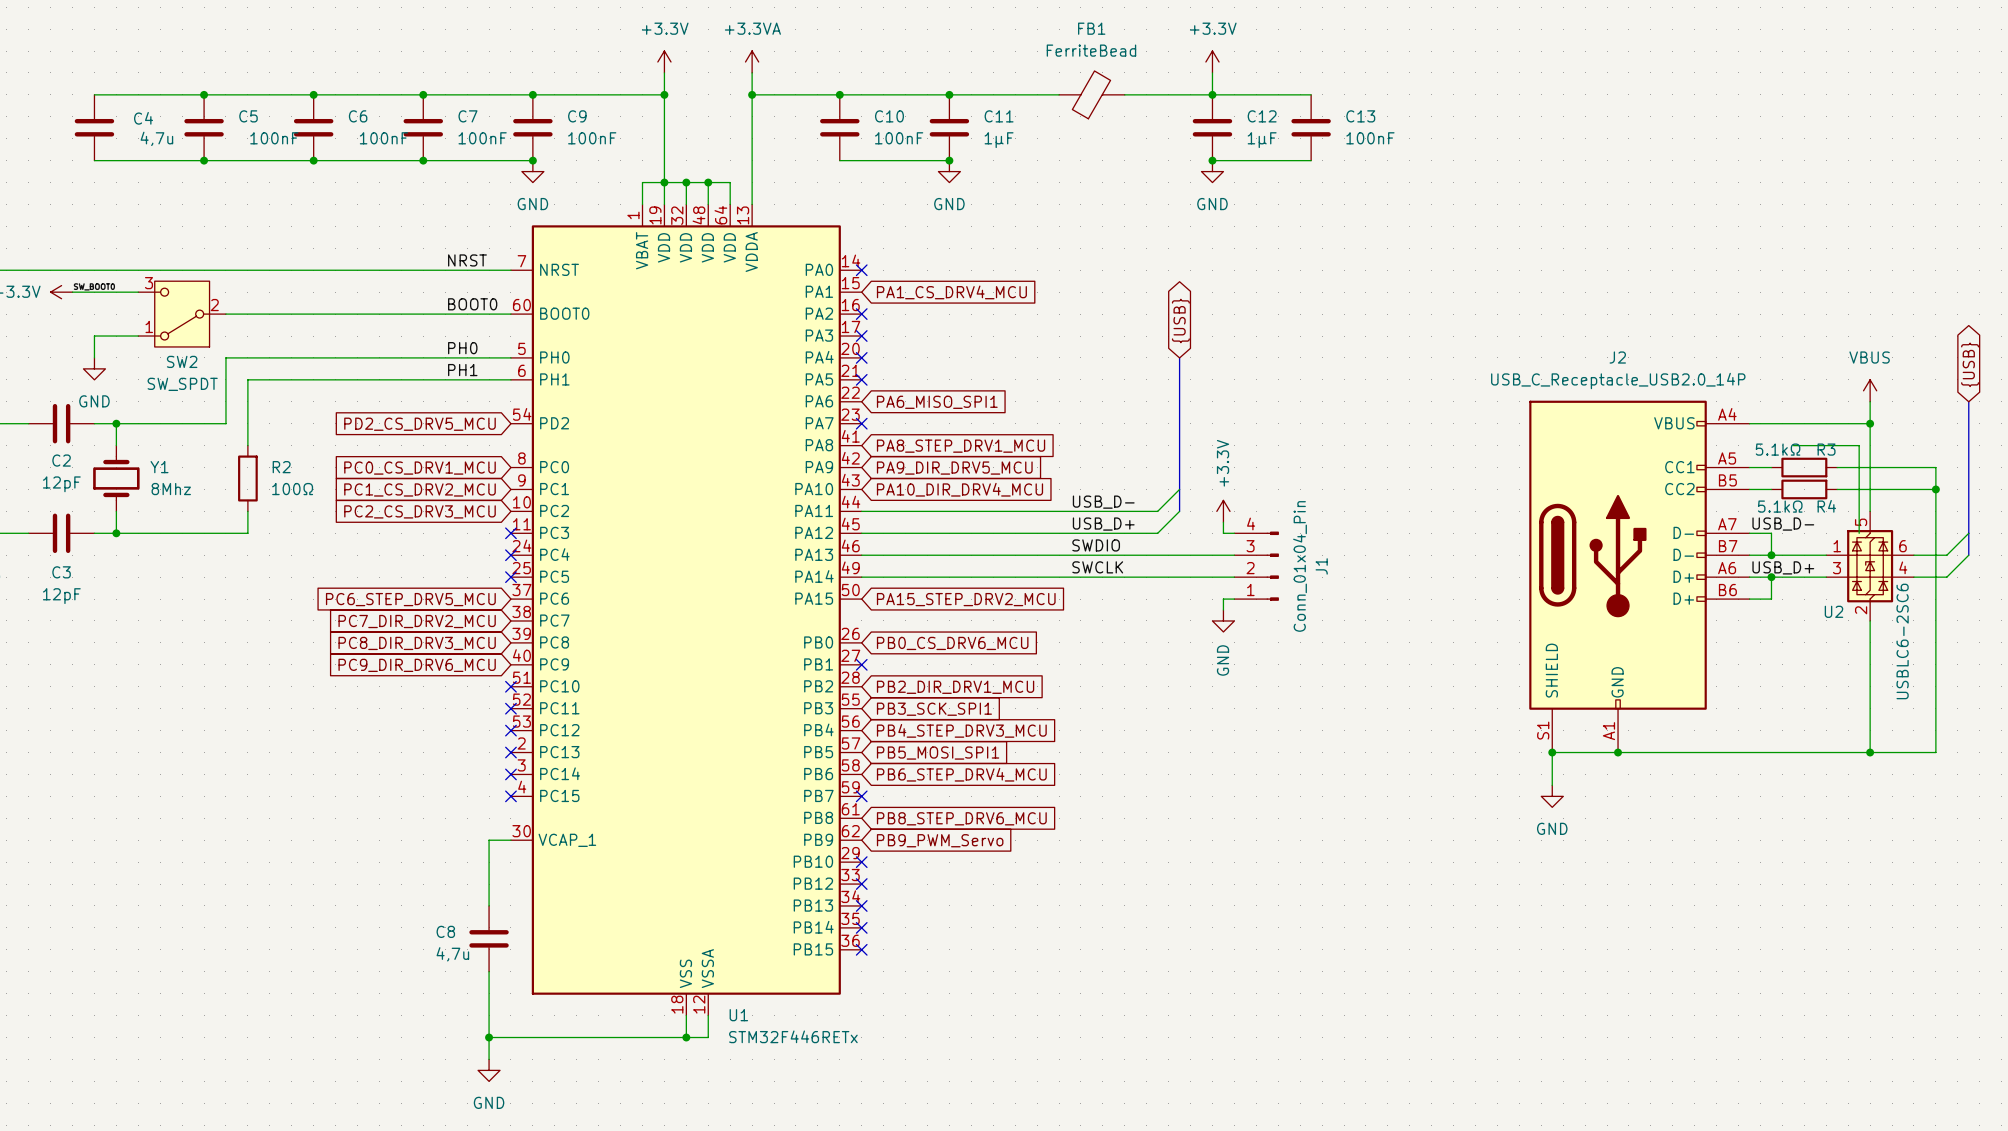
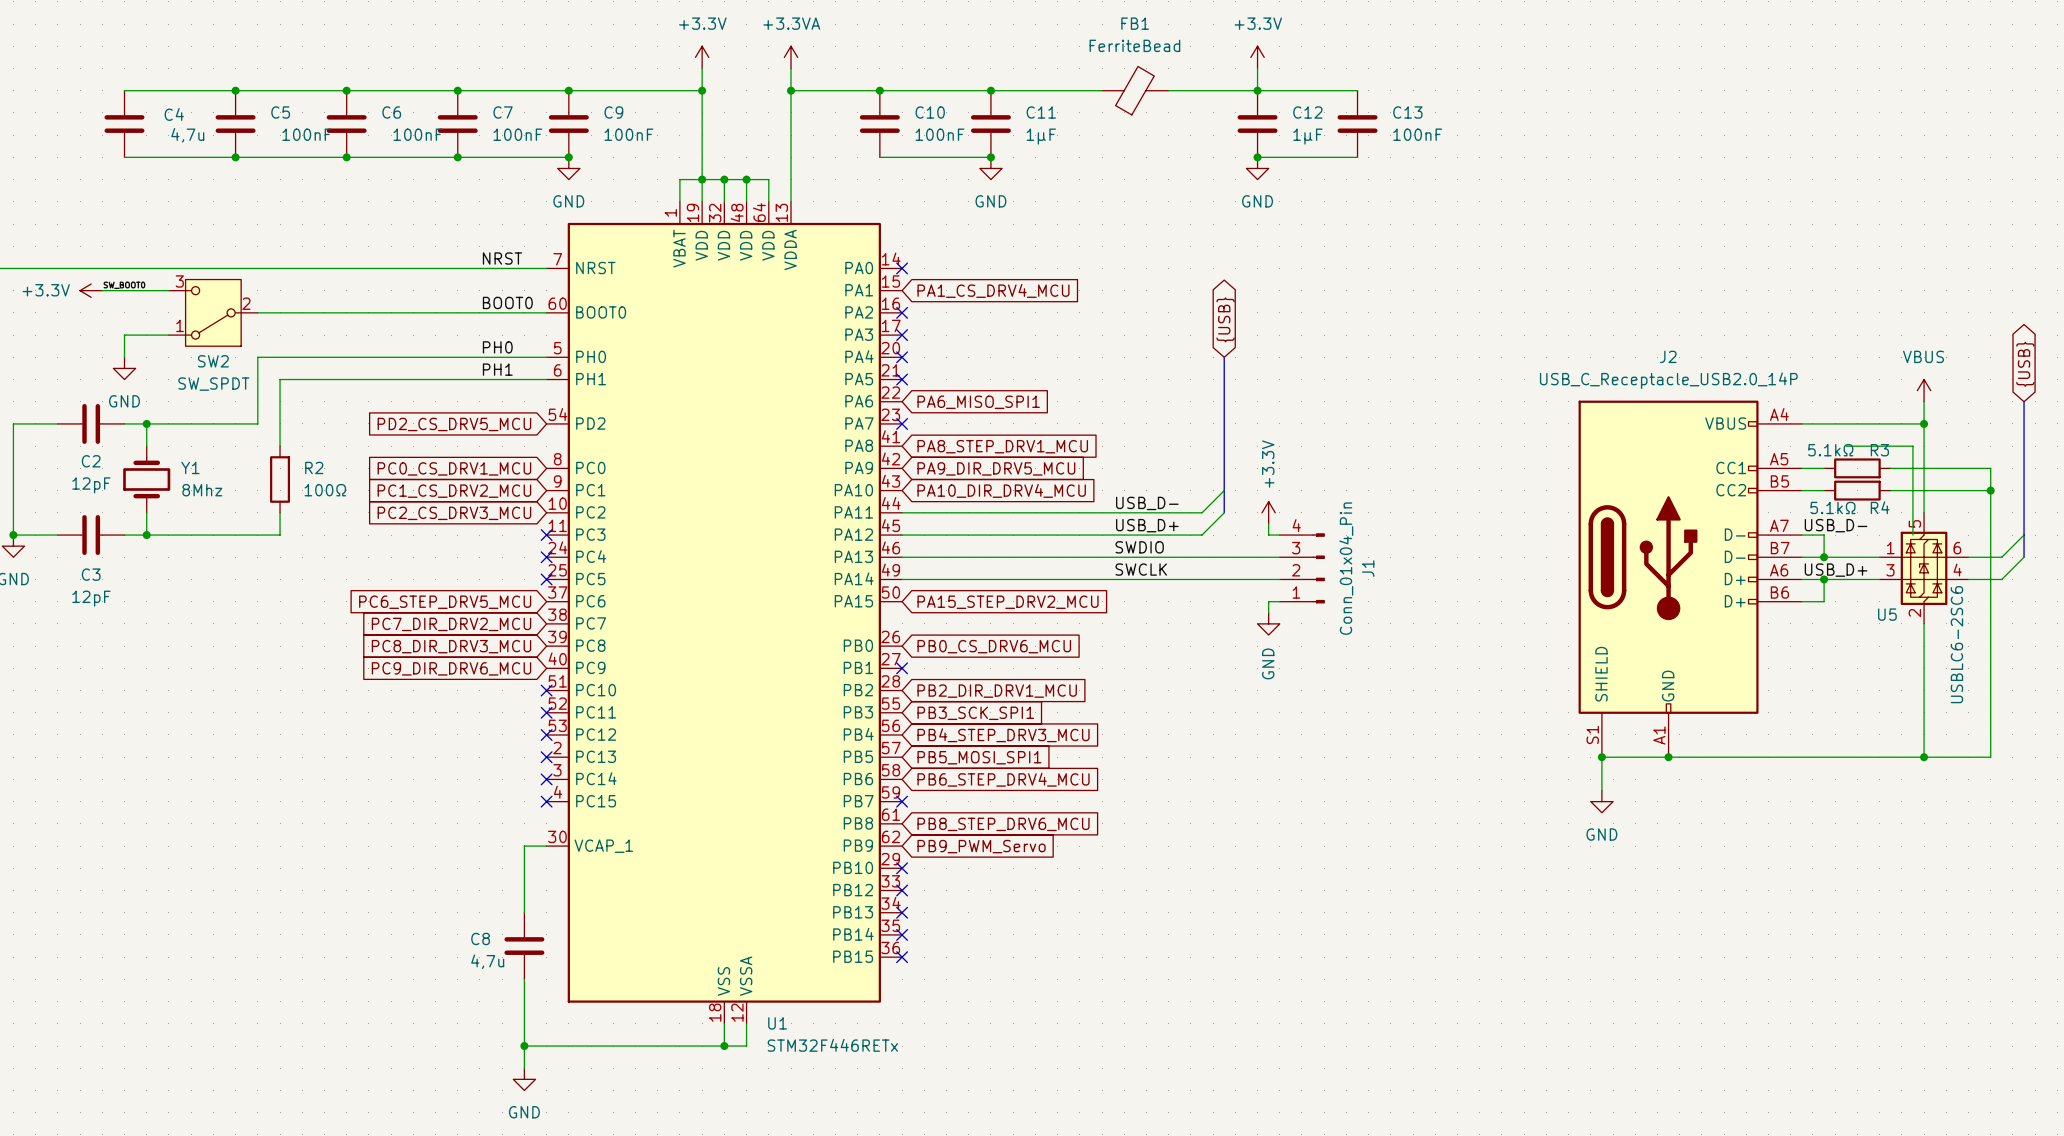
U2 name: U2 (1833, 611) -> U5 (1887, 614)

